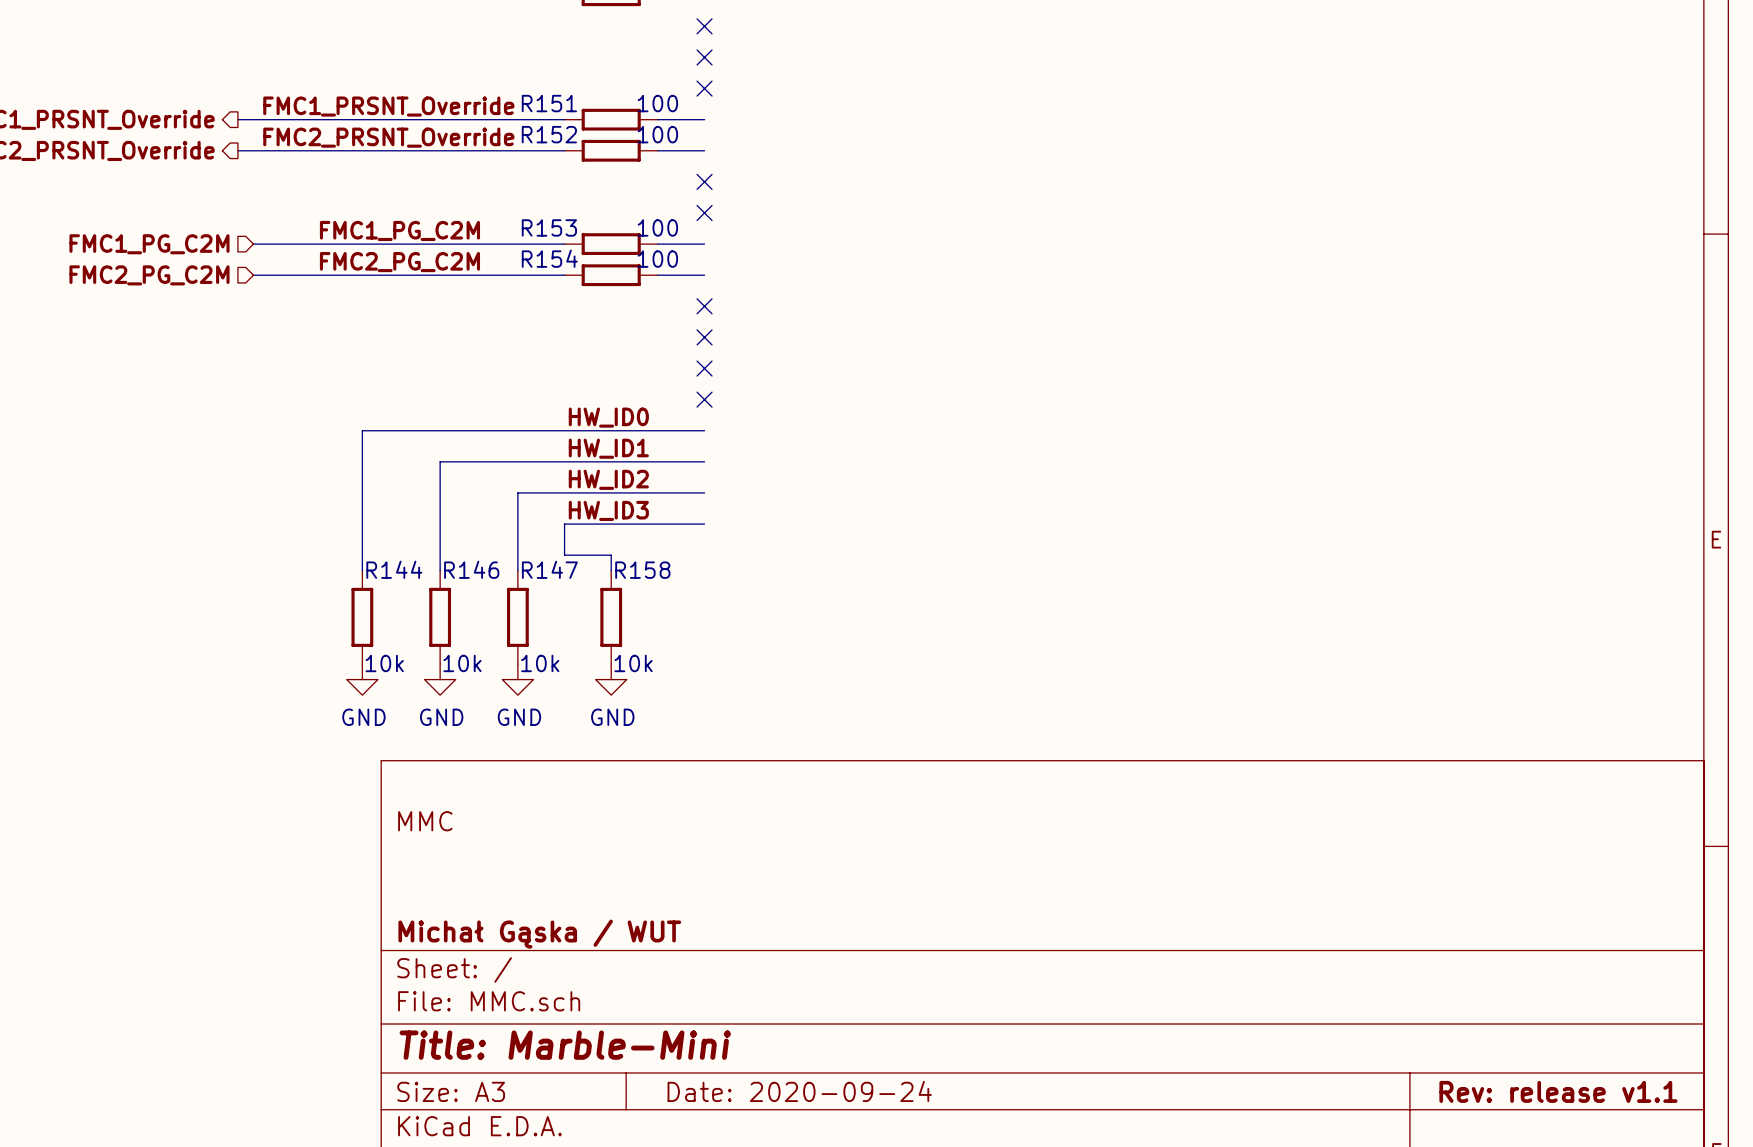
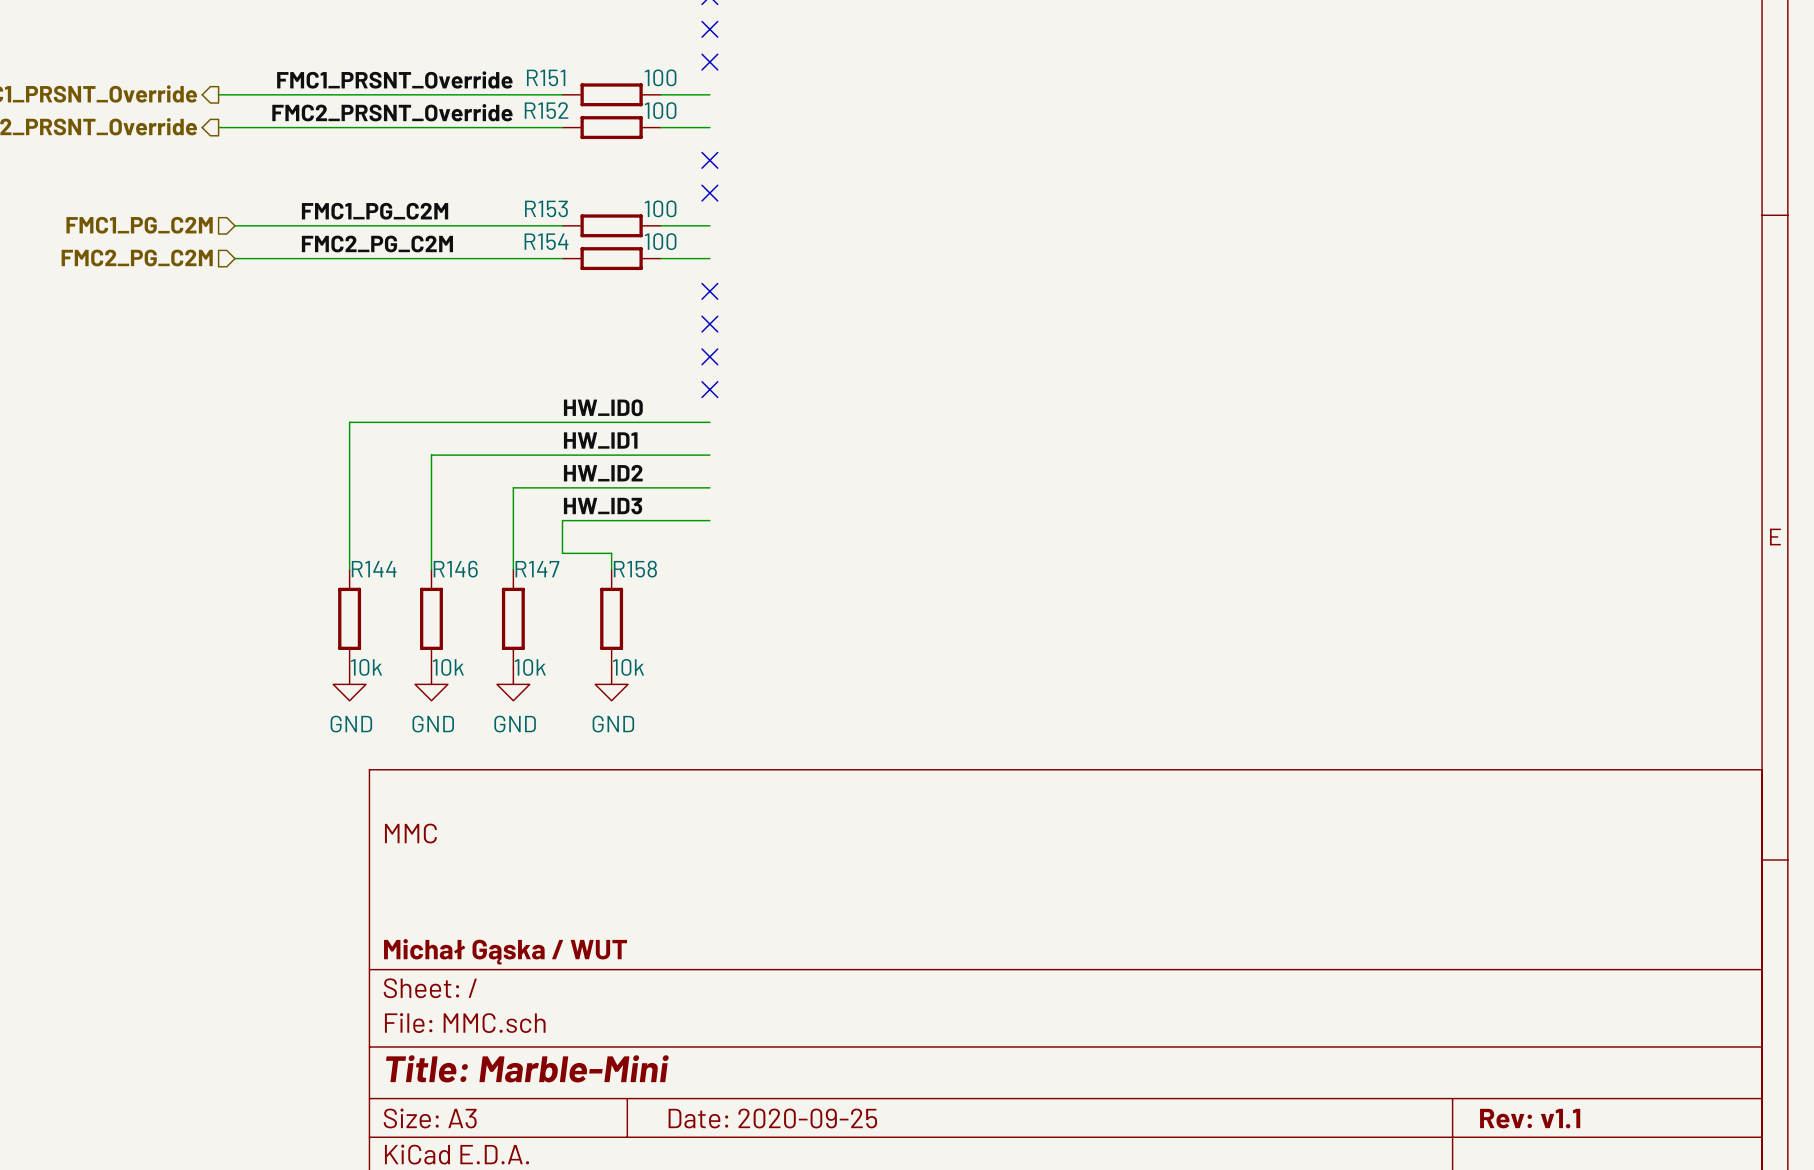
title block: Date: 2020-09-24 (799, 1091) -> Date: 2020-09-25 (772, 1118)
title block: Rev: release v1.1 (1558, 1091) -> Rev: v1.1 (1530, 1118)

